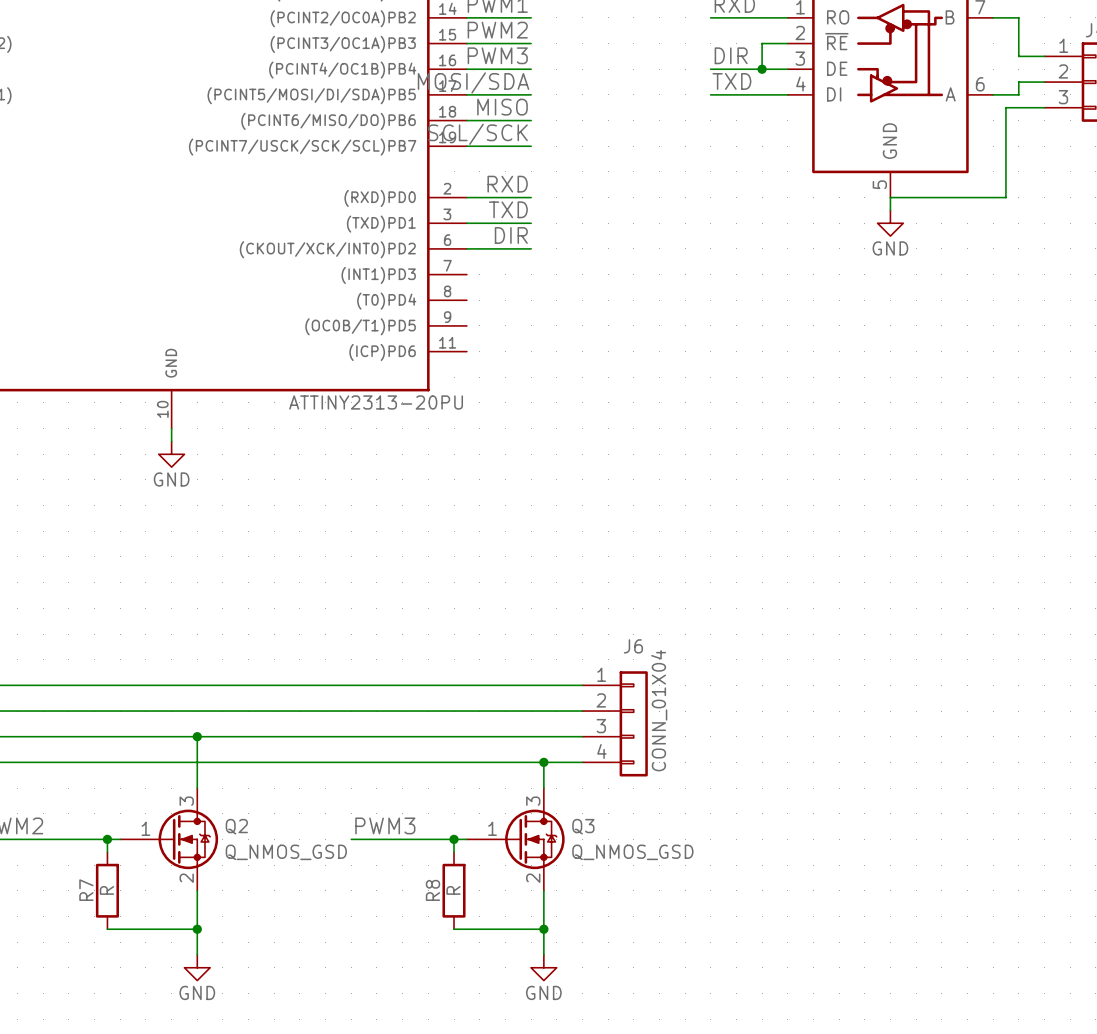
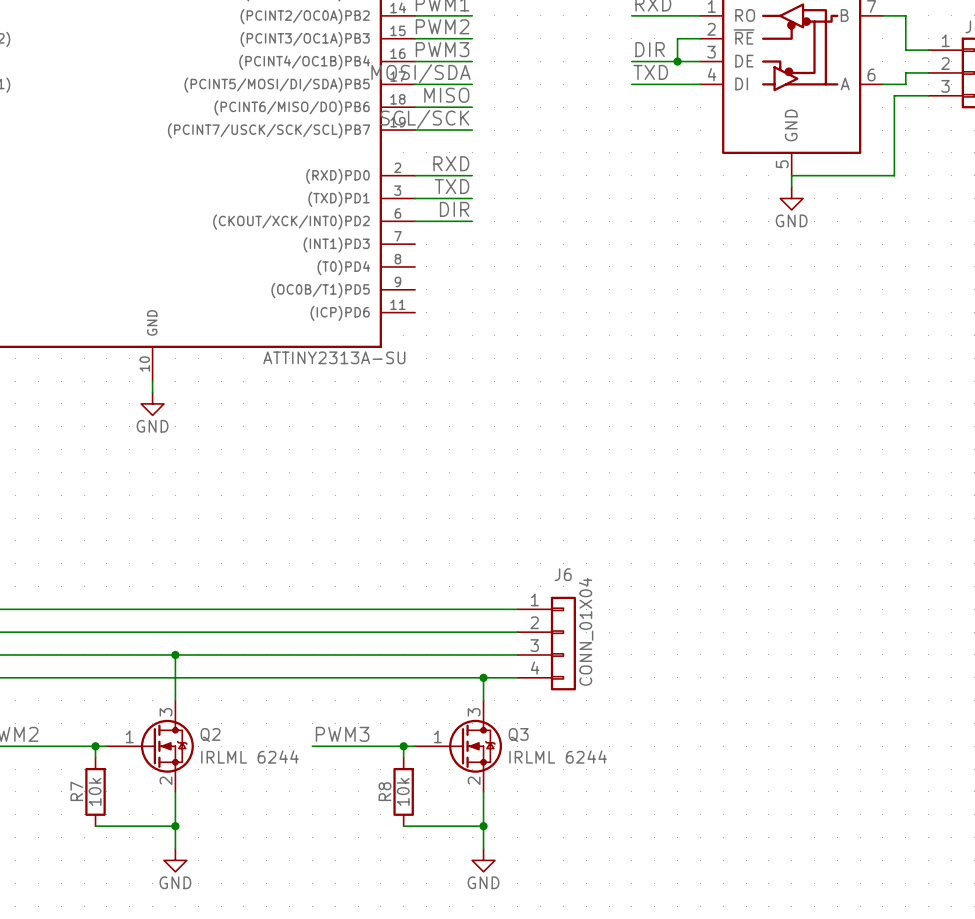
part value: ATTINY2313-20PU (376, 402) -> ATTINY2313A-SU (334, 357)
Q2 value: Q_NMOS_GSD (286, 852) -> IRLML 6244 (249, 756)
Q3 value: Q_NMOS_GSD (632, 852) -> IRLML 6244 (558, 756)
R7 value: R (106, 890) -> 10k (95, 791)
R8 value: R (453, 890) -> 10k (403, 791)

